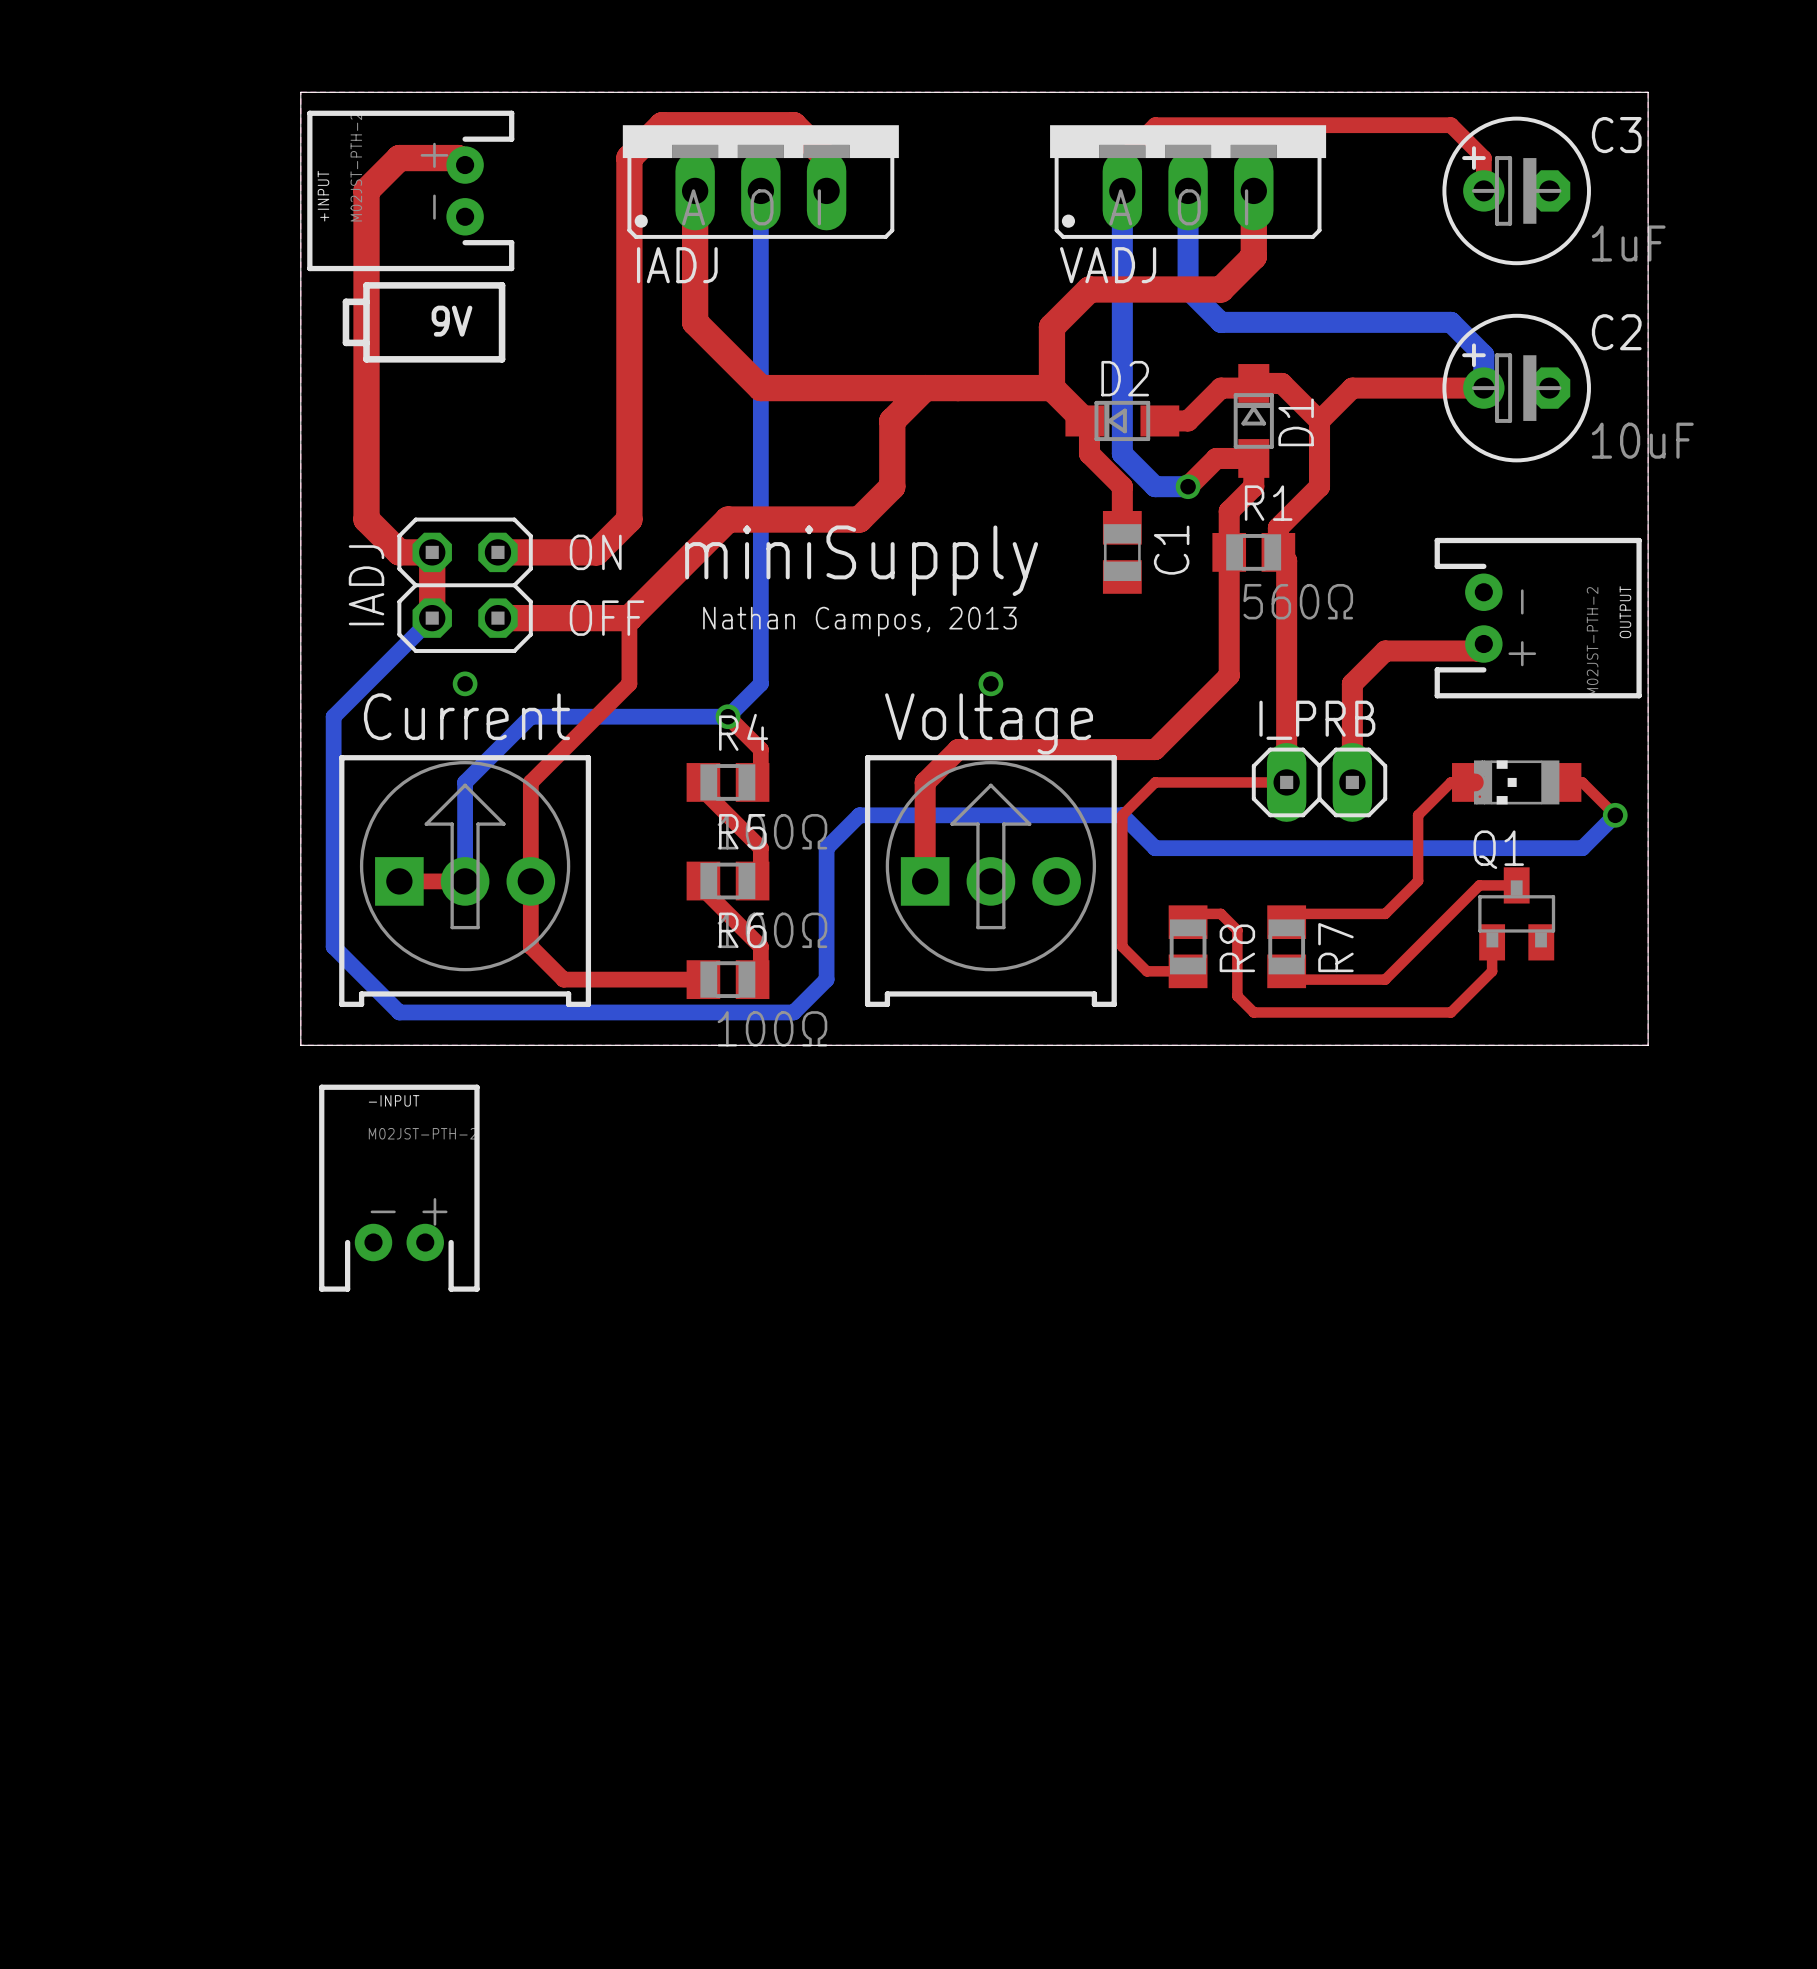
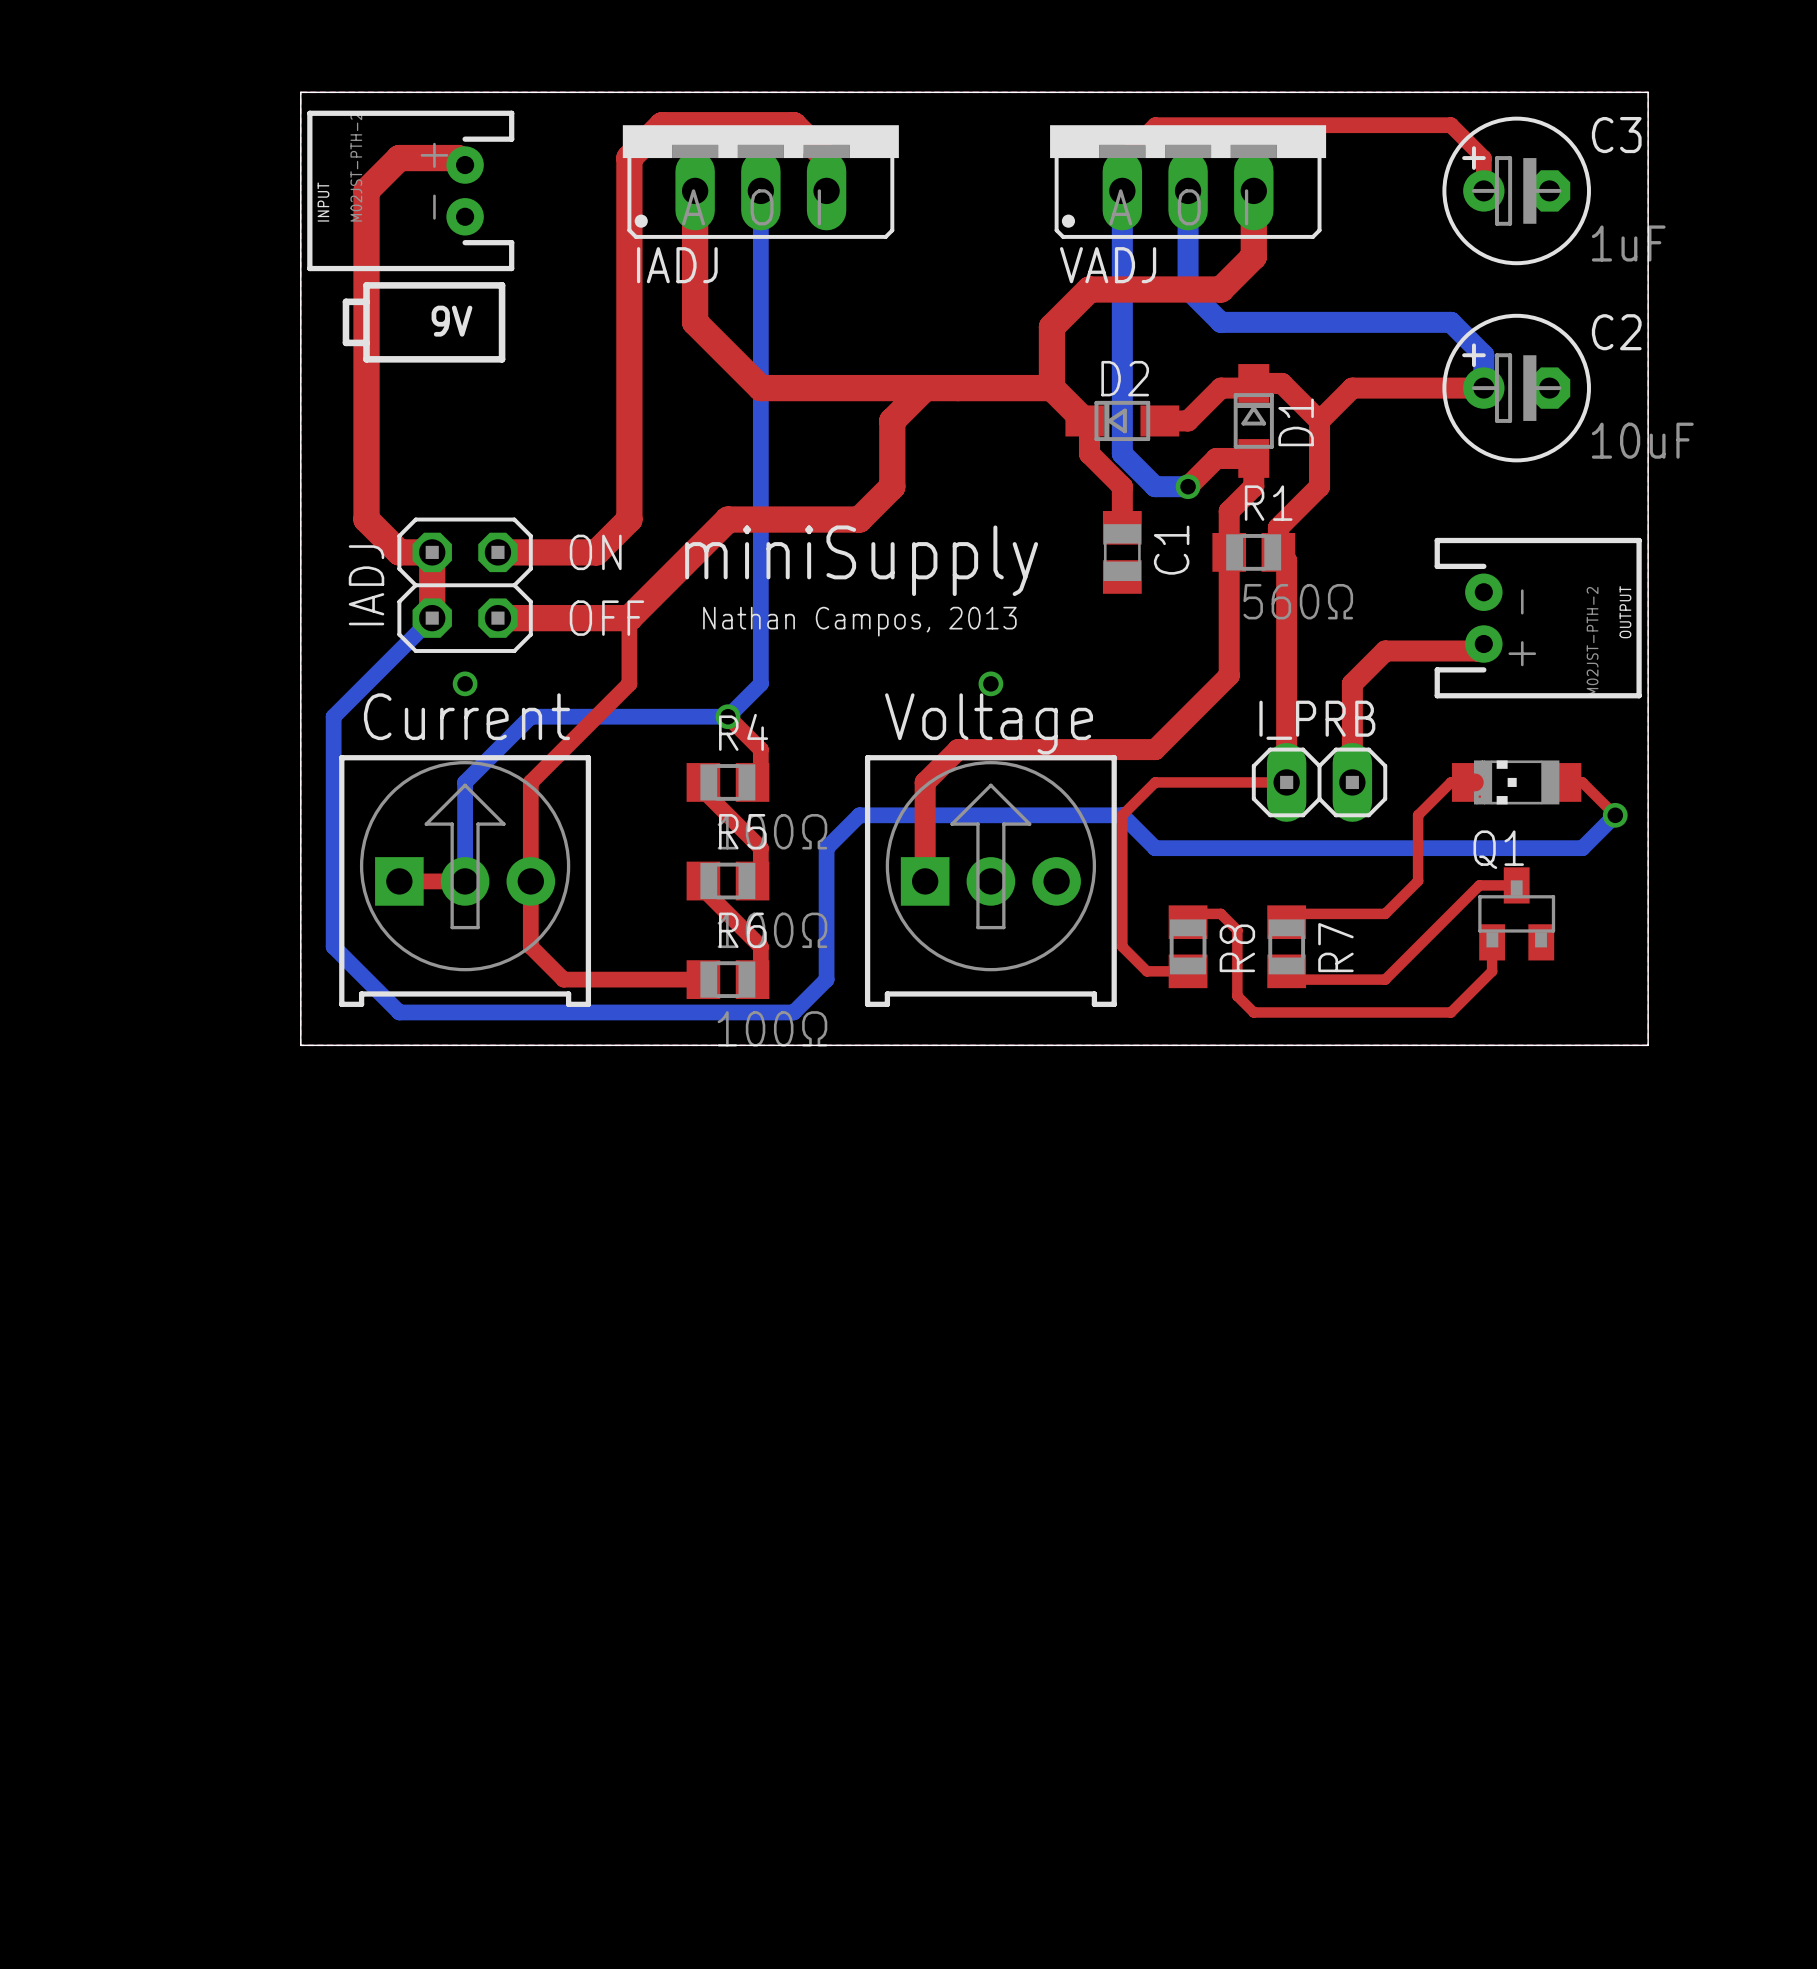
+INPUT name: +INPUT (323, 196) -> INPUT (323, 202)
-INPUT: M02JST-PTH-2 (399, 1188) -> none

